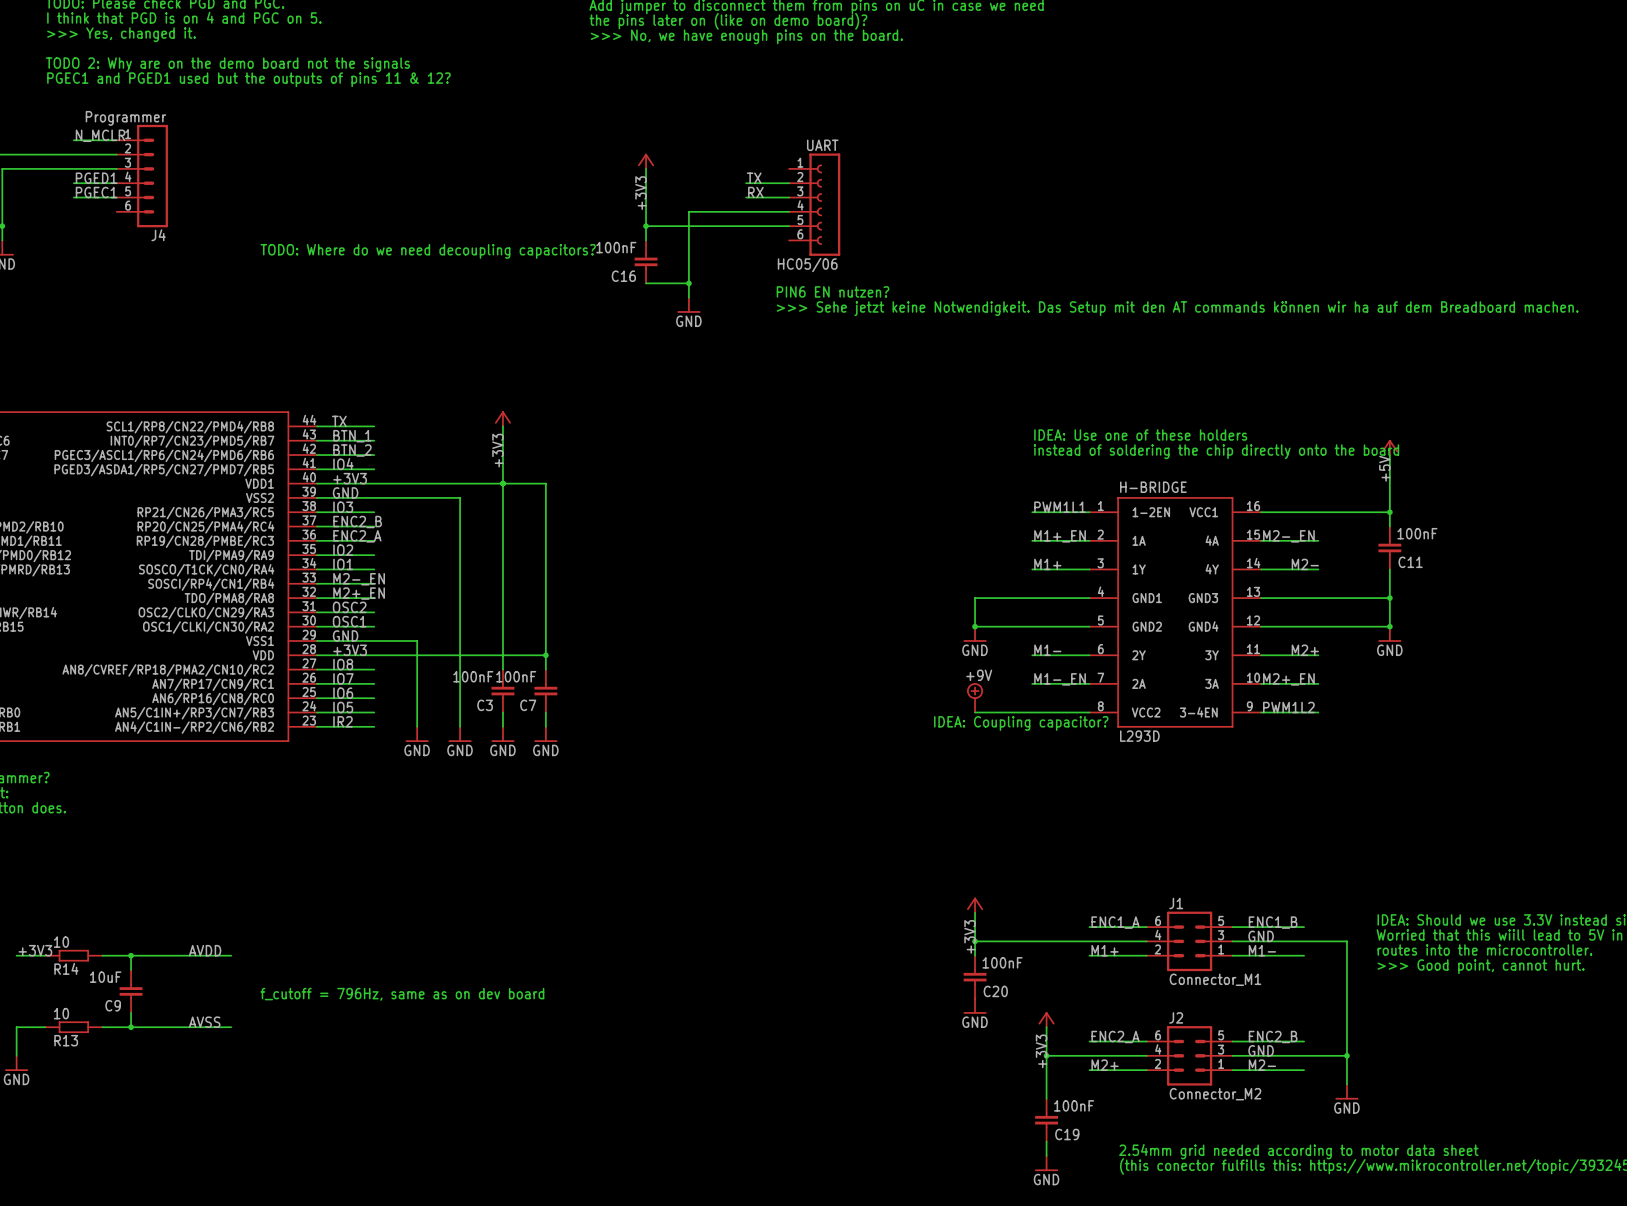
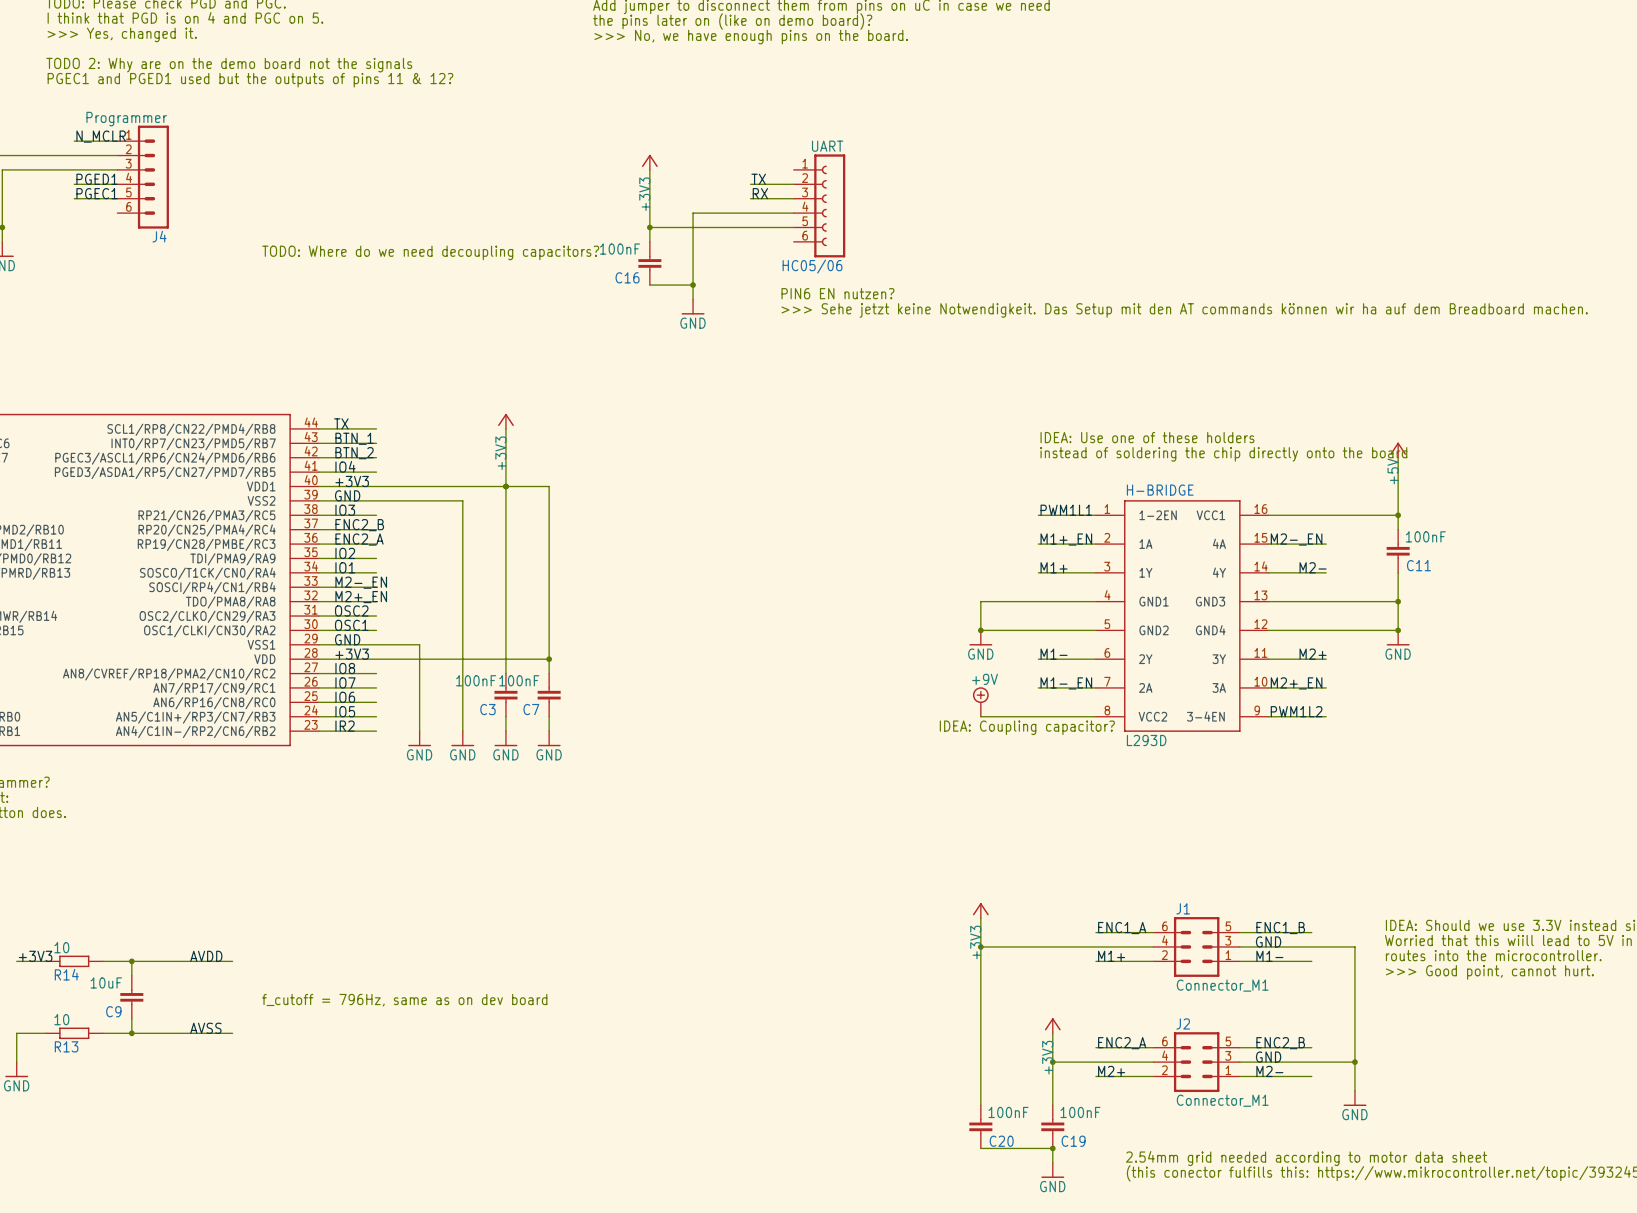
wire: none -> (980, 961) (980, 1105)
C20 position: (975, 977) -> (980, 1126)
power symbol: GND (975, 1006) -> none
J2 value: Connector_M2 (1215, 1094) -> Connector_M1 (1222, 1100)
wire: none -> (980, 1148) (1052, 1148)
junction: none -> (1052, 1148)

